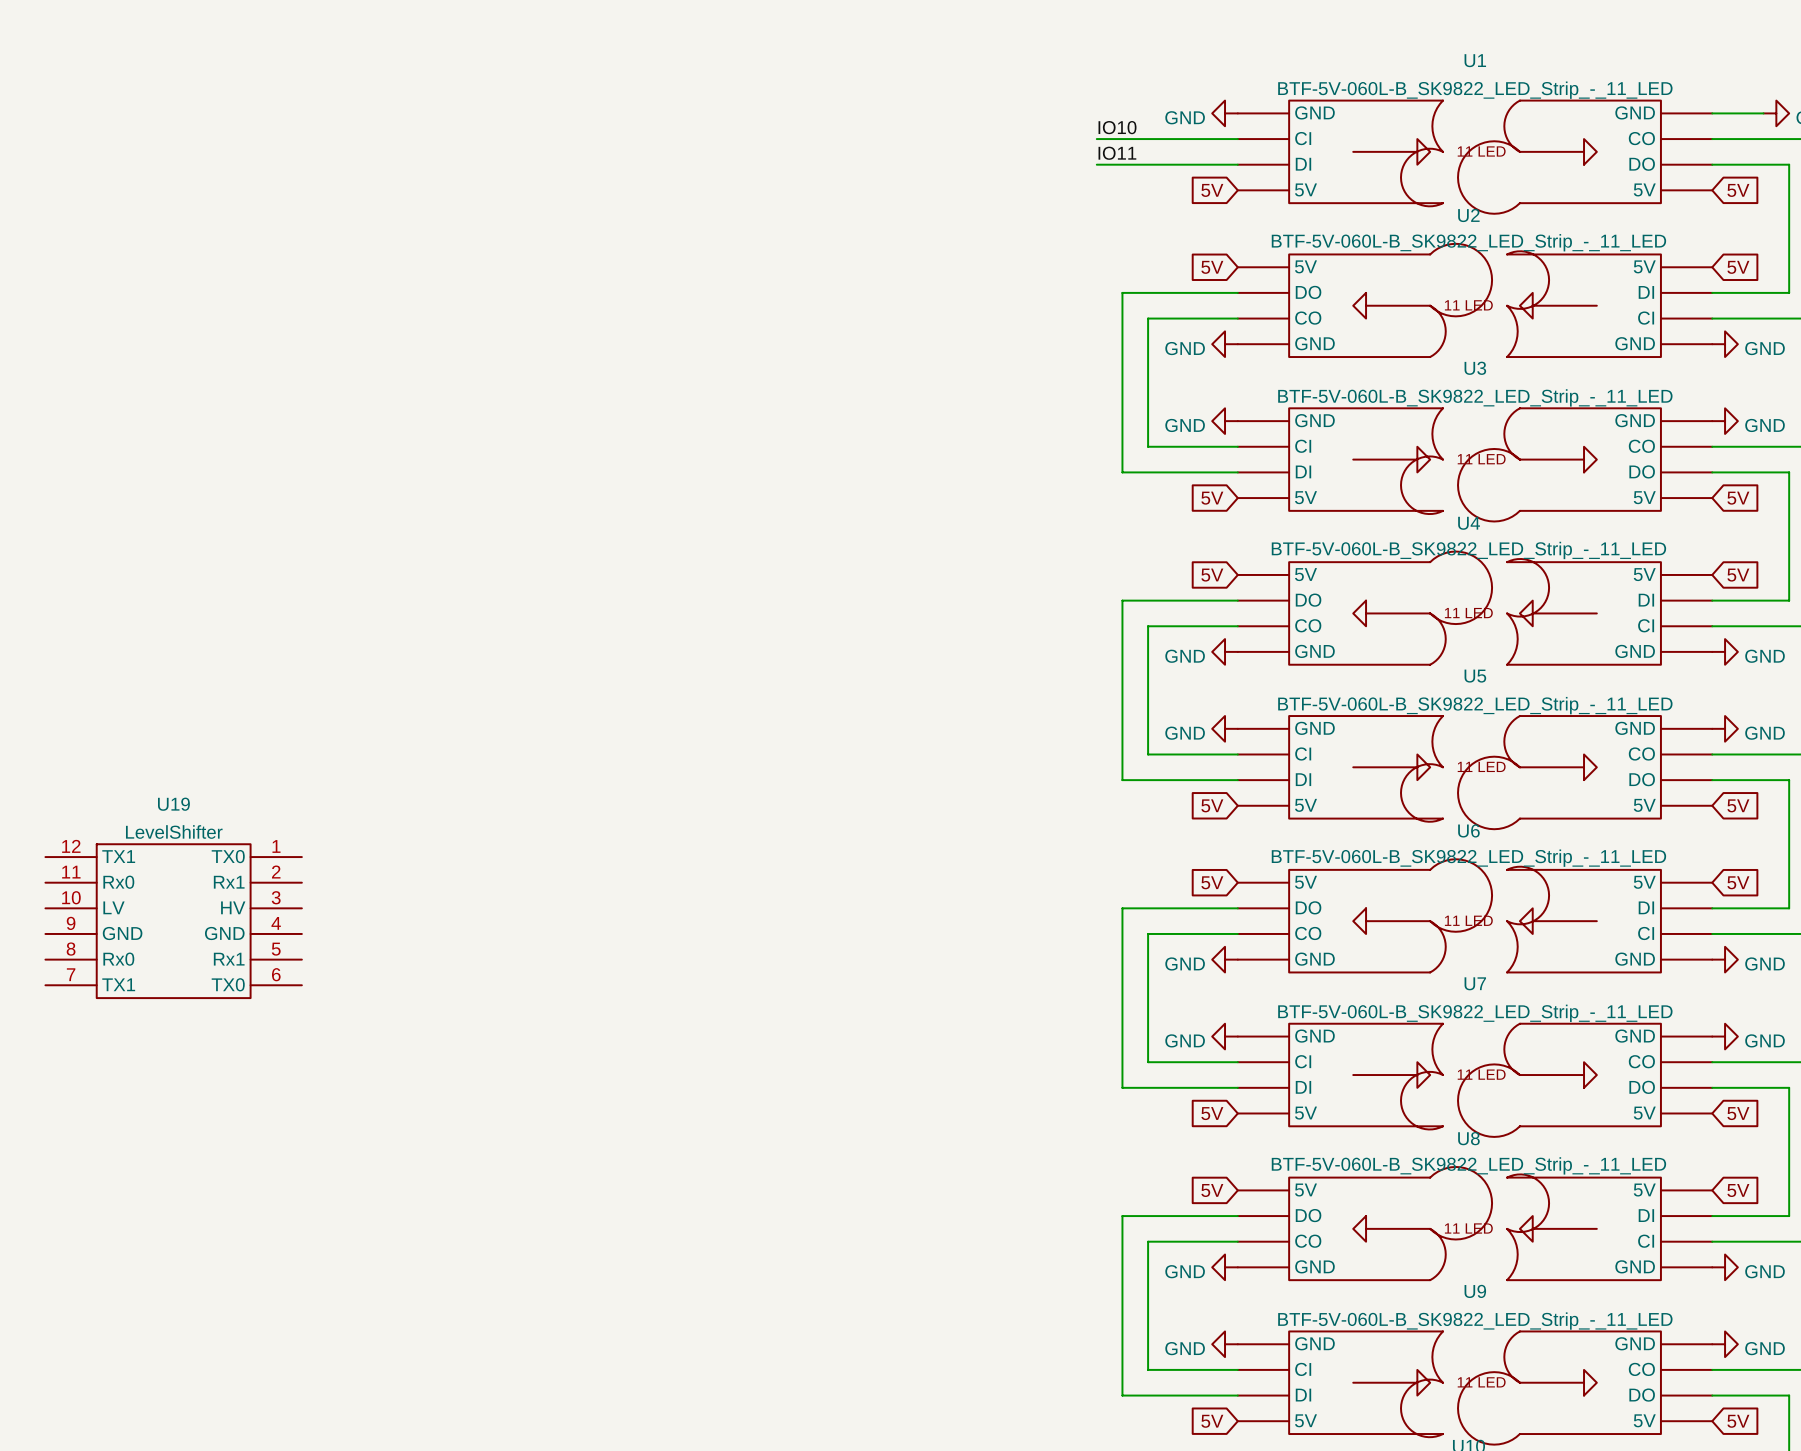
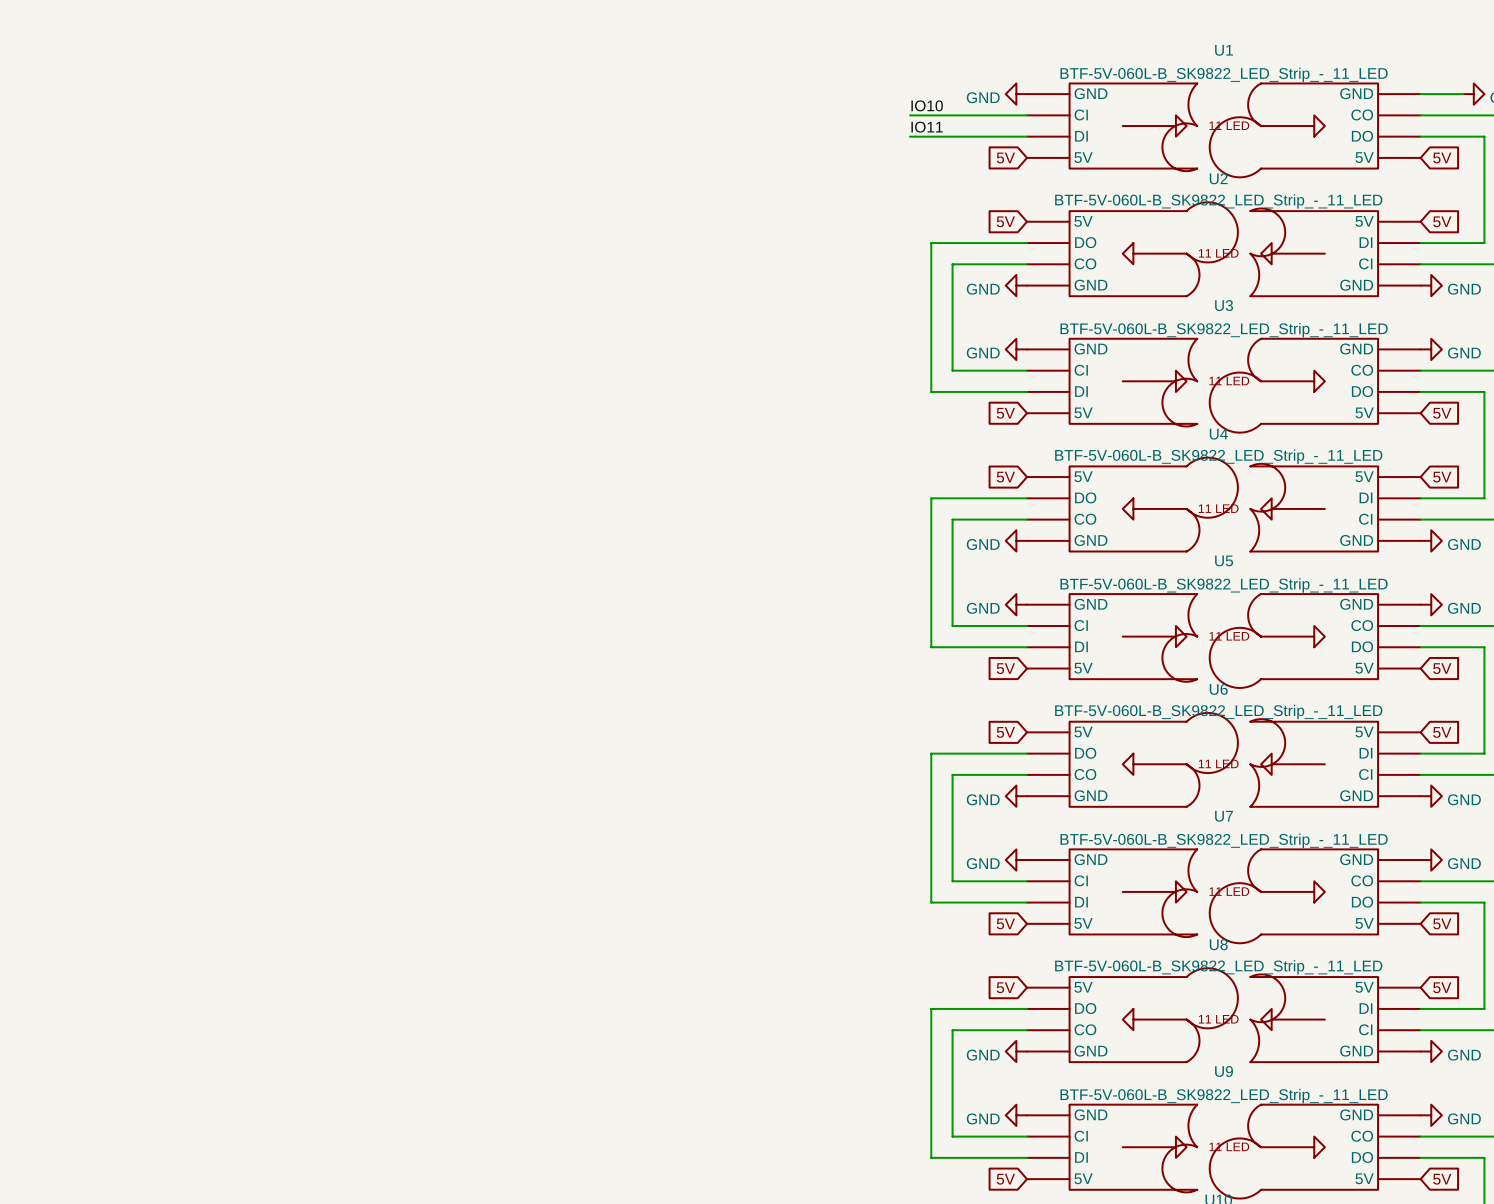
U19: LevelShifter (173, 921) -> none

